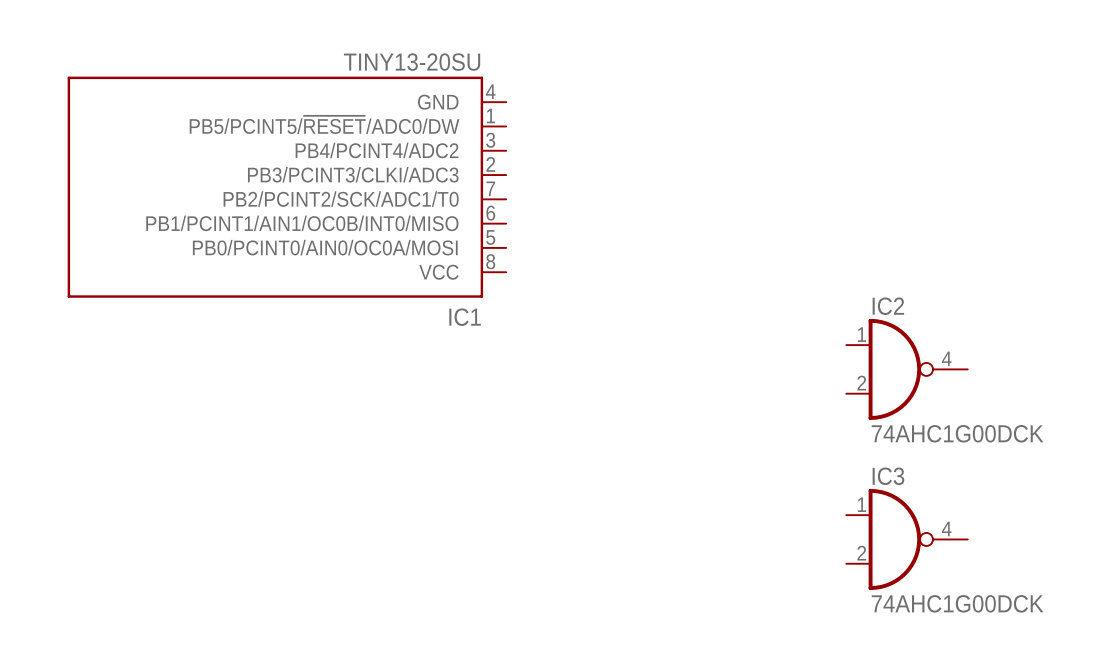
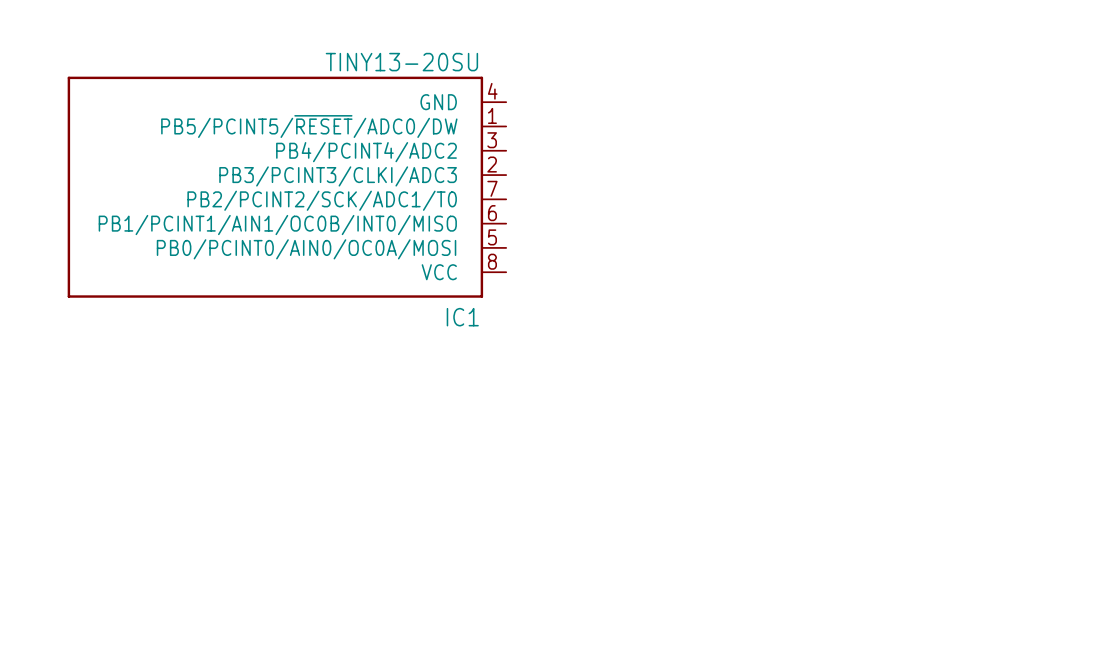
IC2: 74AHC1G00DCK (907, 369) -> none
IC3: 74AHC1G00DCK (907, 539) -> none

